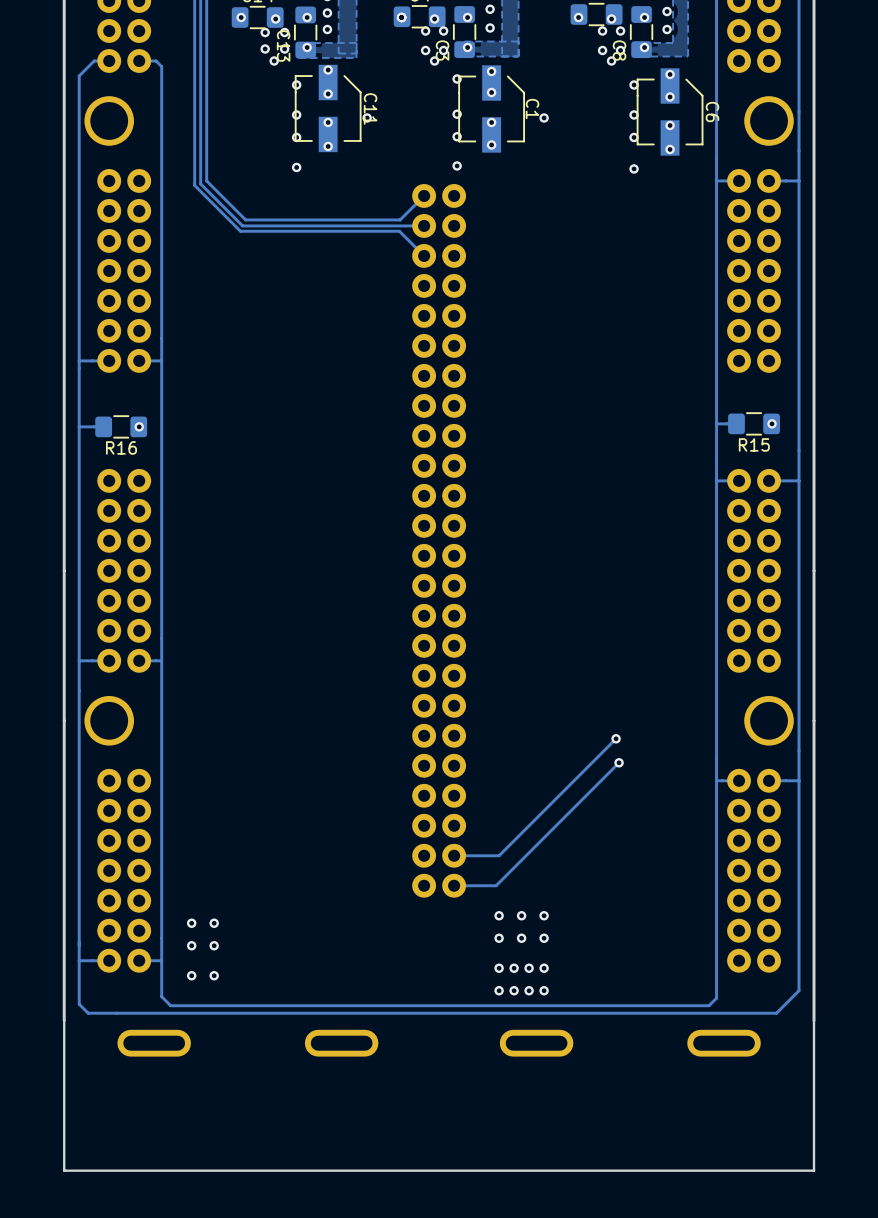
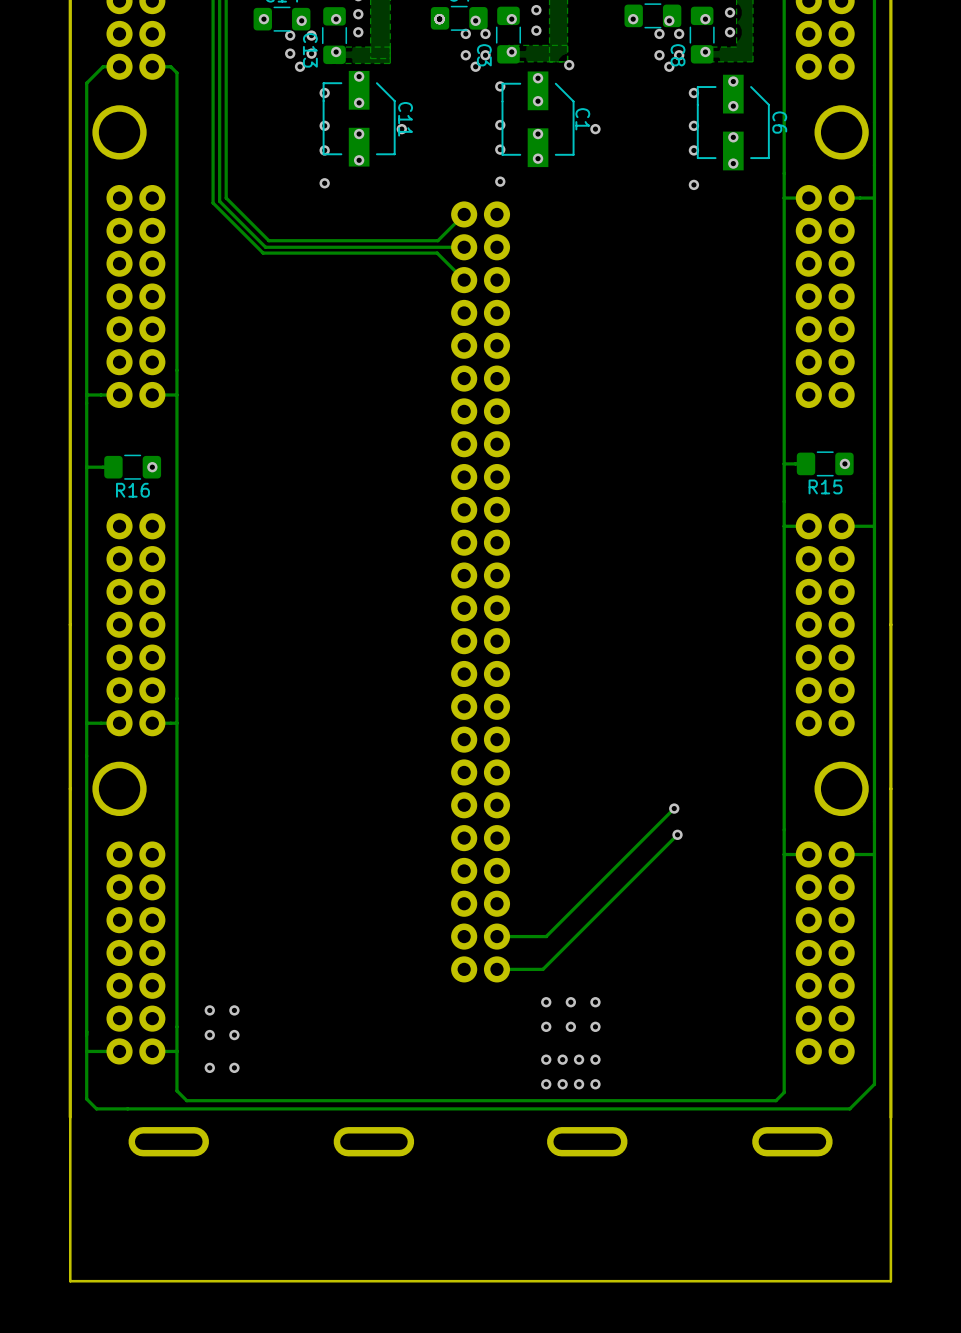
via: none -> (569, 65)

